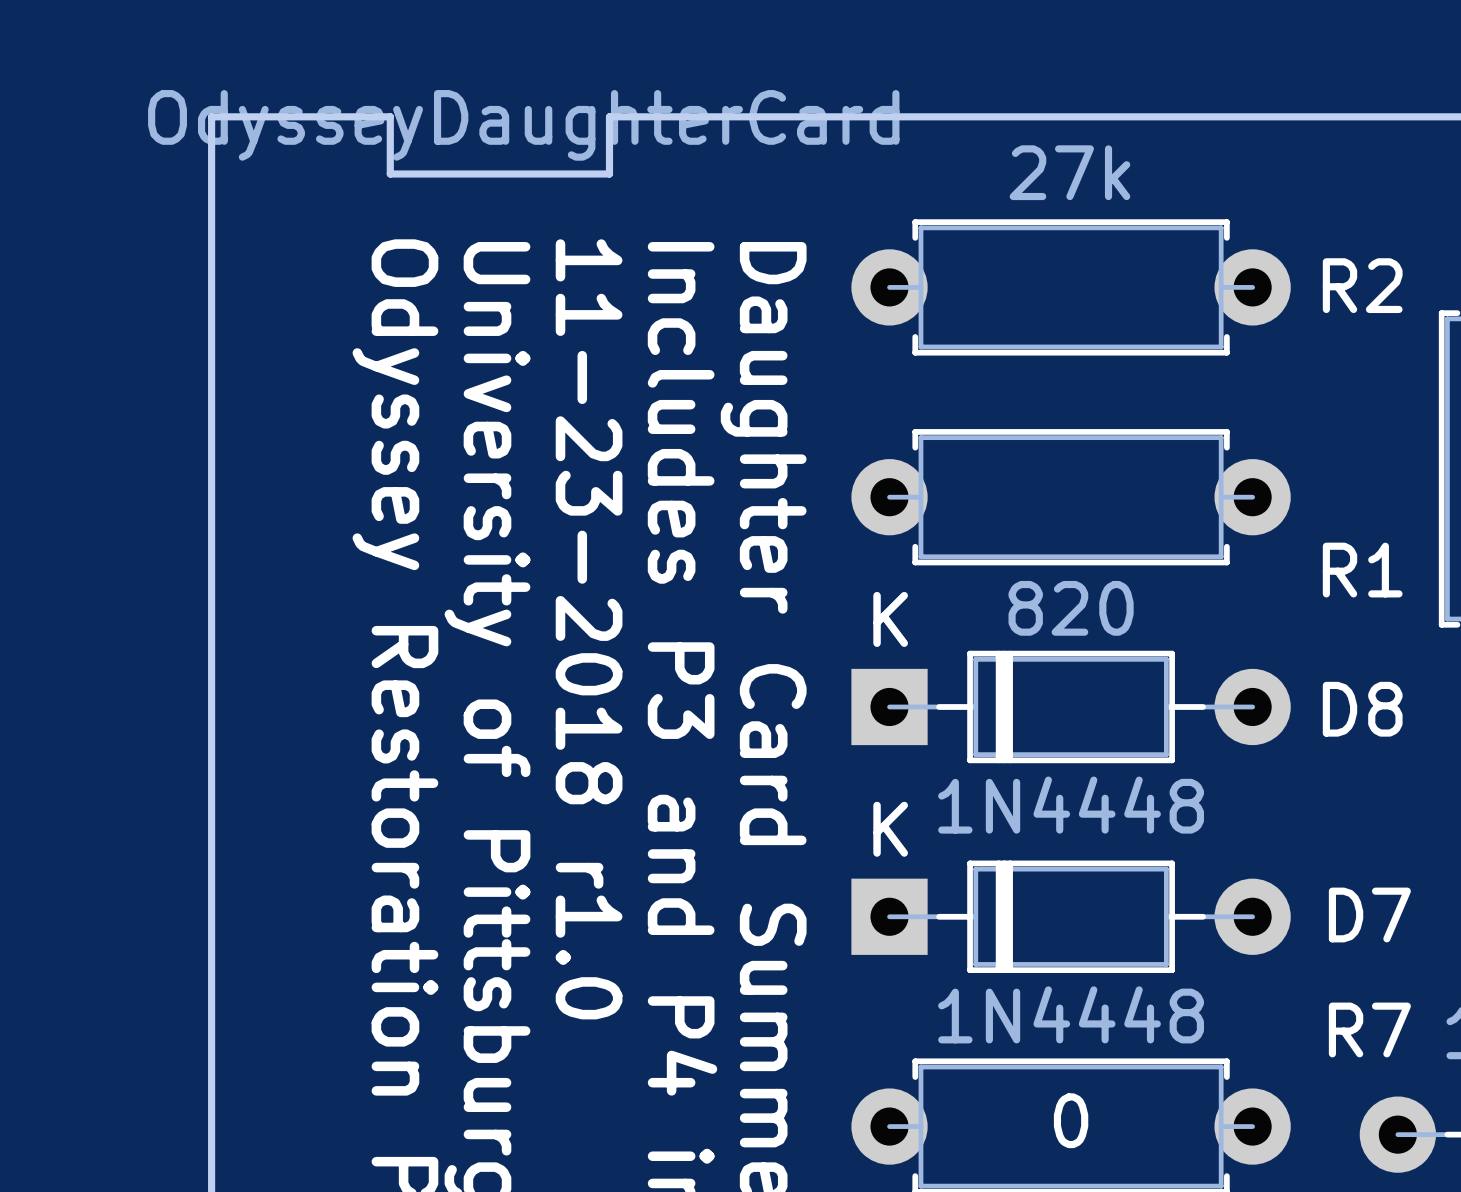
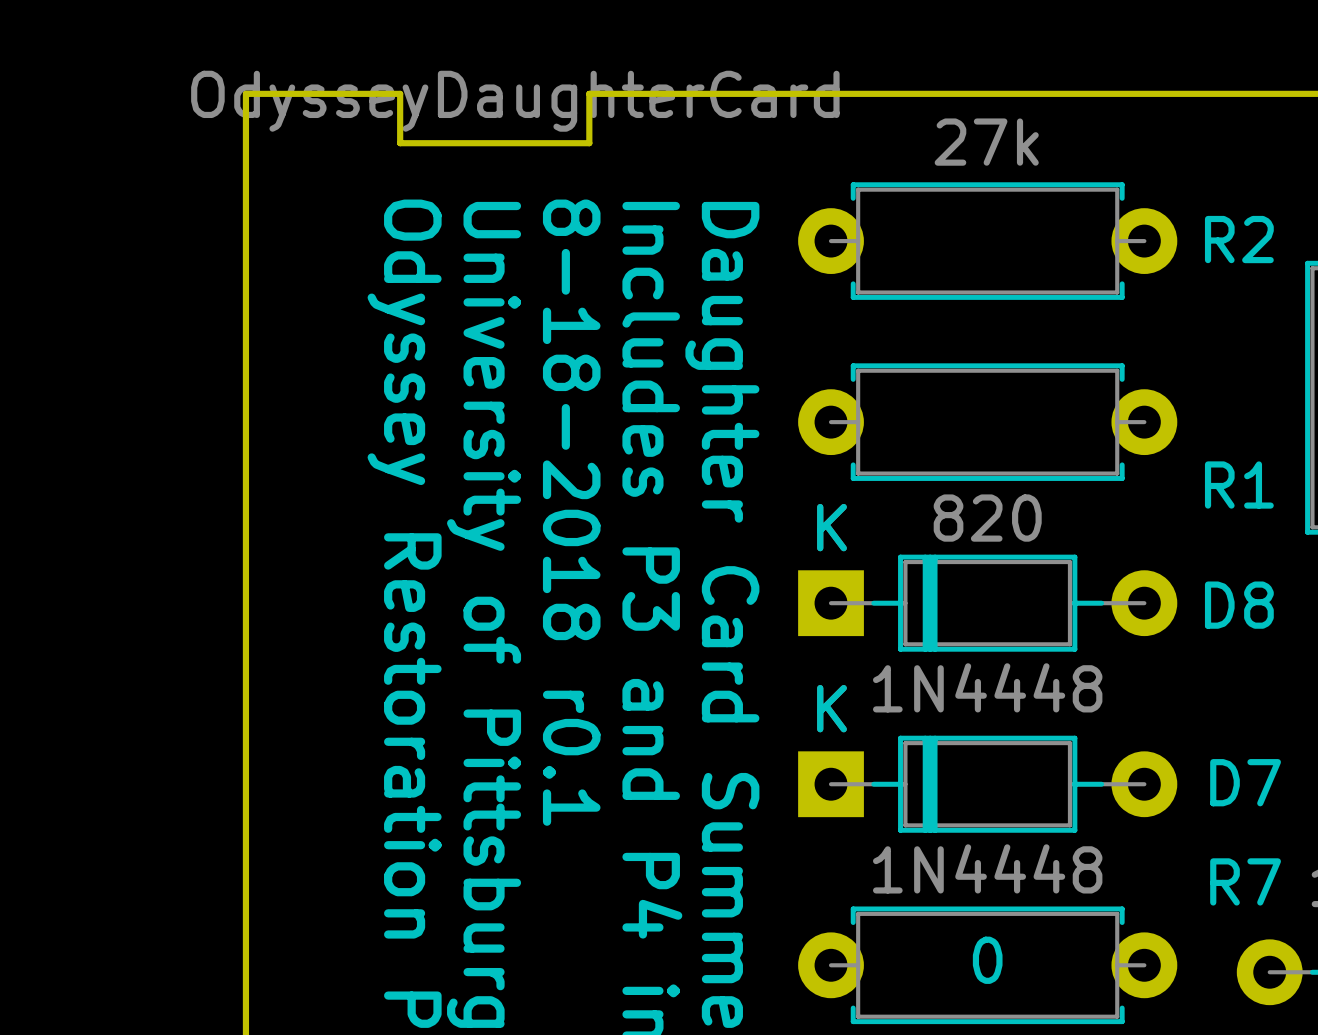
text: 11-23-2018 r1.0 (589, 629) -> 8-18-2018 r0.1 (571, 512)

